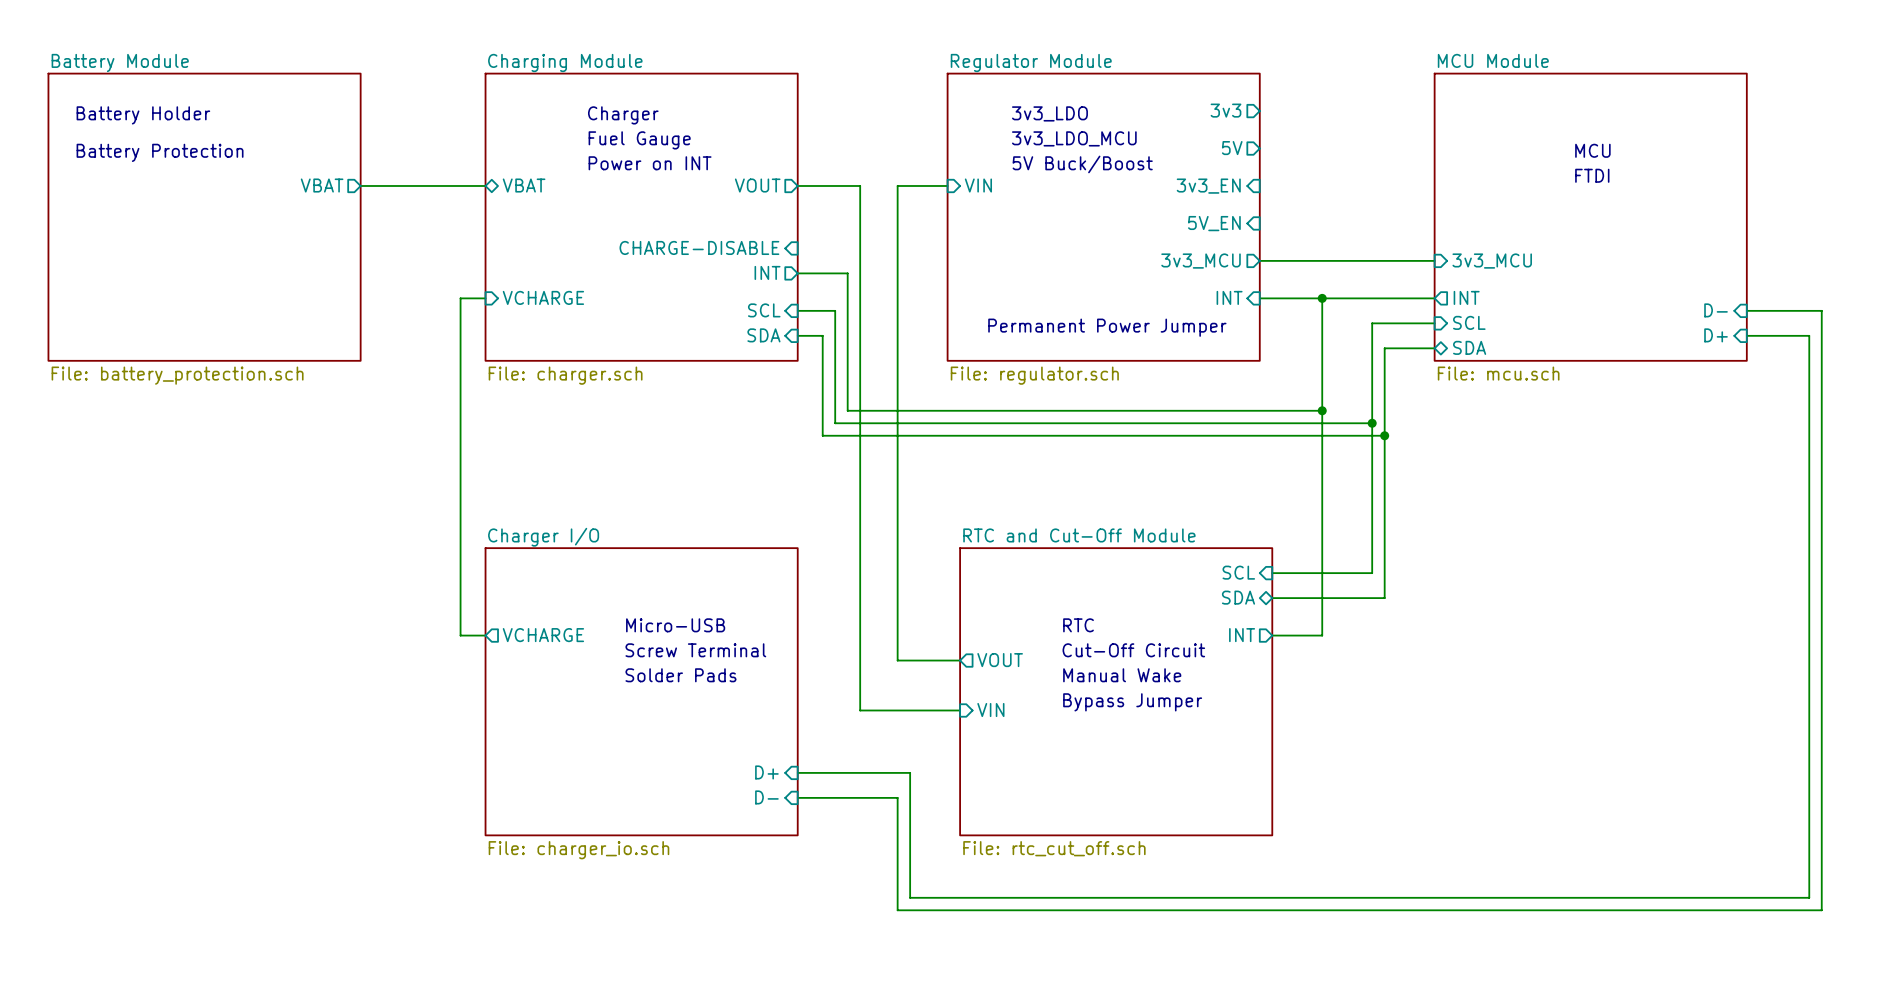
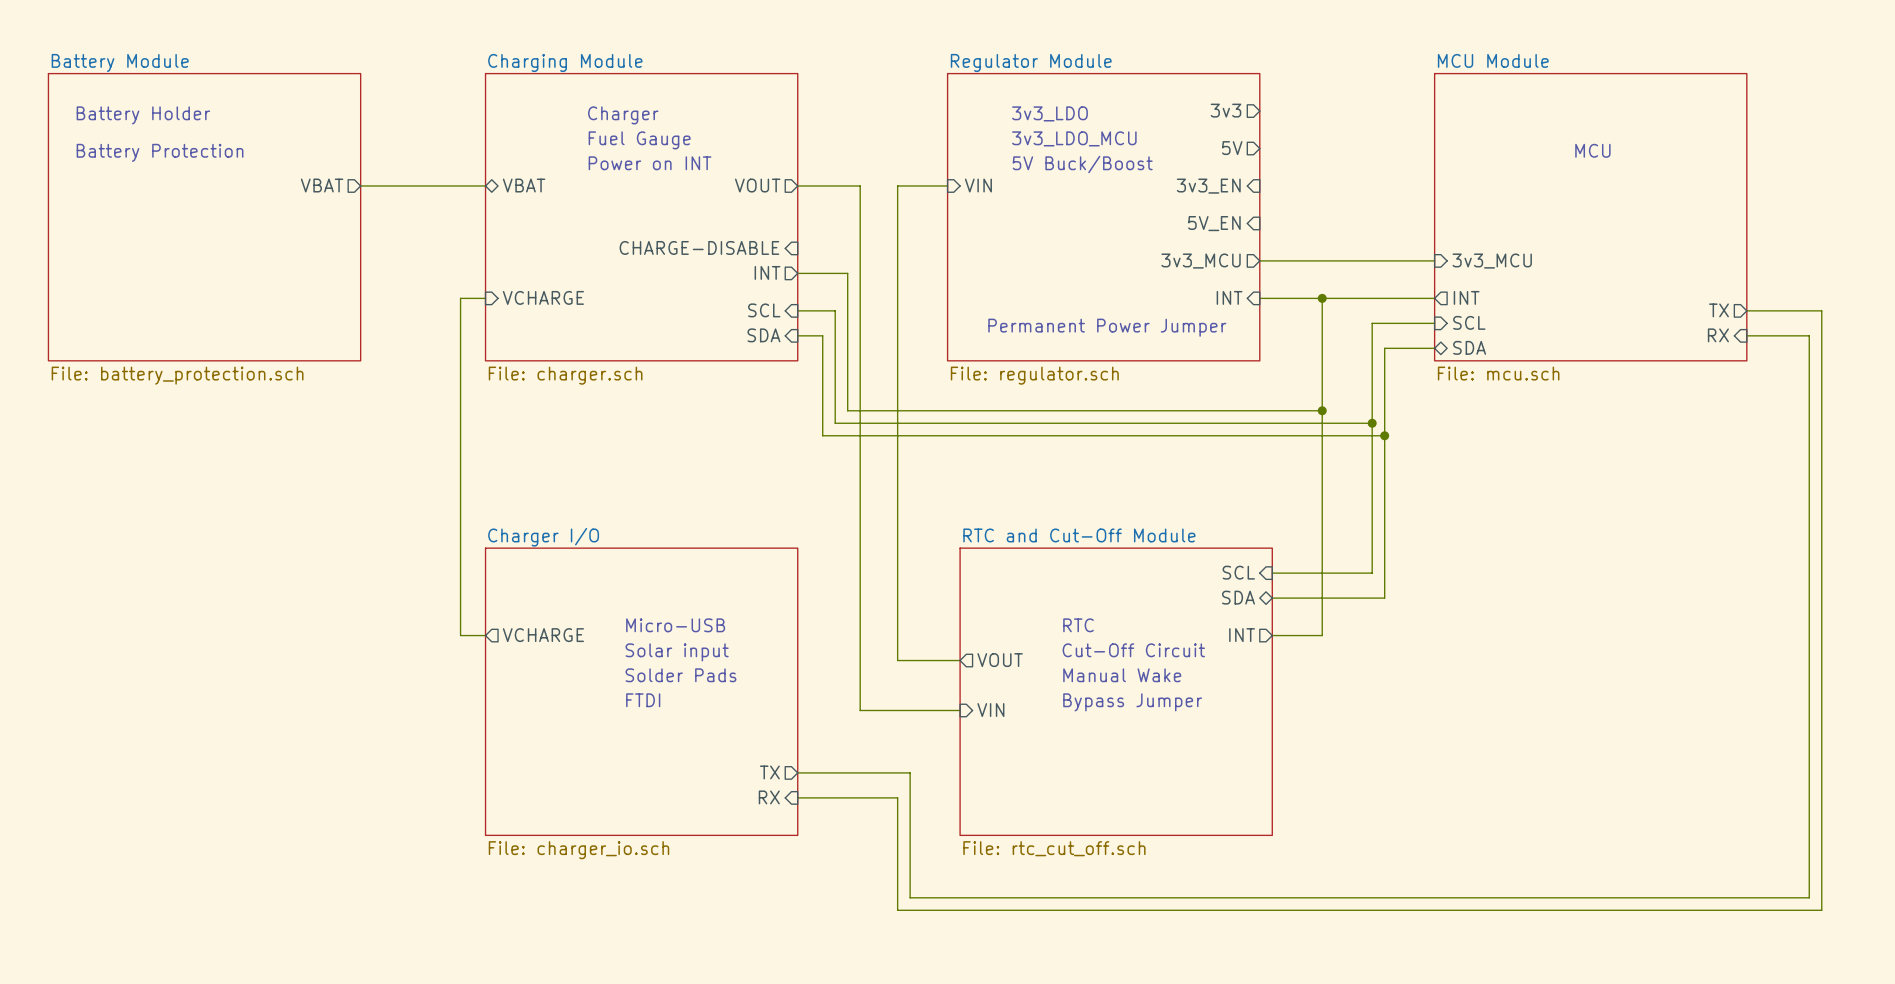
text: FTDI (1592, 175) -> none
sheet pin shape: input (1716, 310) -> output (1718, 310)
sheet pin: D- (1716, 310) -> TX (1718, 310)
sheet pin: D+ (1716, 335) -> RX (1718, 335)
text: Screw Terminal (695, 650) -> Solar input (677, 652)
text: none -> FTDI (643, 700)
sheet pin shape: input (766, 772) -> output (769, 772)
sheet pin: D+ (766, 772) -> TX (769, 772)
sheet pin: D- (766, 797) -> RX (769, 797)

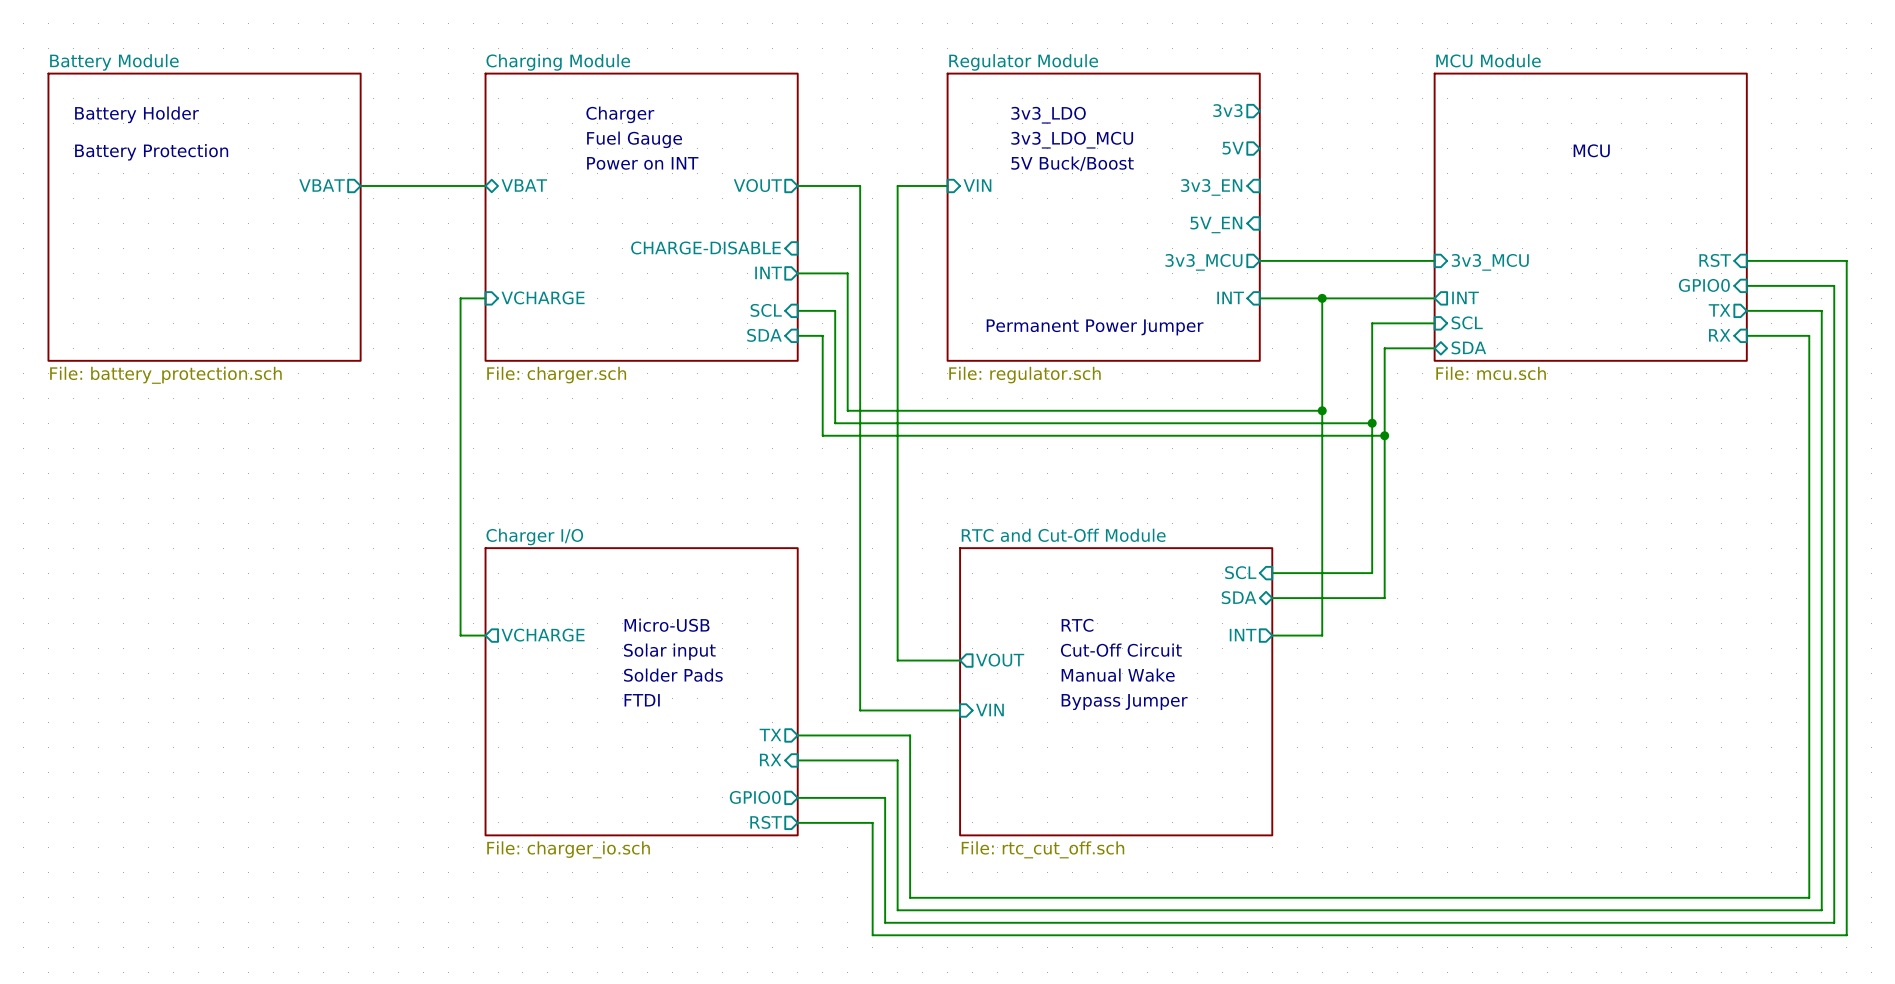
sheet pin: none -> RST (1715, 260)
wire: none -> (1746, 260) (1846, 260) (1846, 935) (872, 935) (872, 822) (797, 822)
sheet pin: none -> GPIO0 (1704, 285)
wire: none -> (1746, 285) (1834, 285) (1834, 922) (885, 922) (885, 797)
sheet pin: none -> RX (770, 759)
sheet pin position: TX (769, 772) -> TX (770, 735)
wire: (797, 772) (910, 772) -> (797, 735) (910, 735) (910, 772)
sheet pin shape: input (769, 797) -> output (755, 797)
sheet pin: RX (769, 797) -> GPIO0 (755, 797)
wire: (885, 797) (897, 797) -> (797, 760) (897, 760) (897, 797)
sheet pin: none -> RST (766, 822)

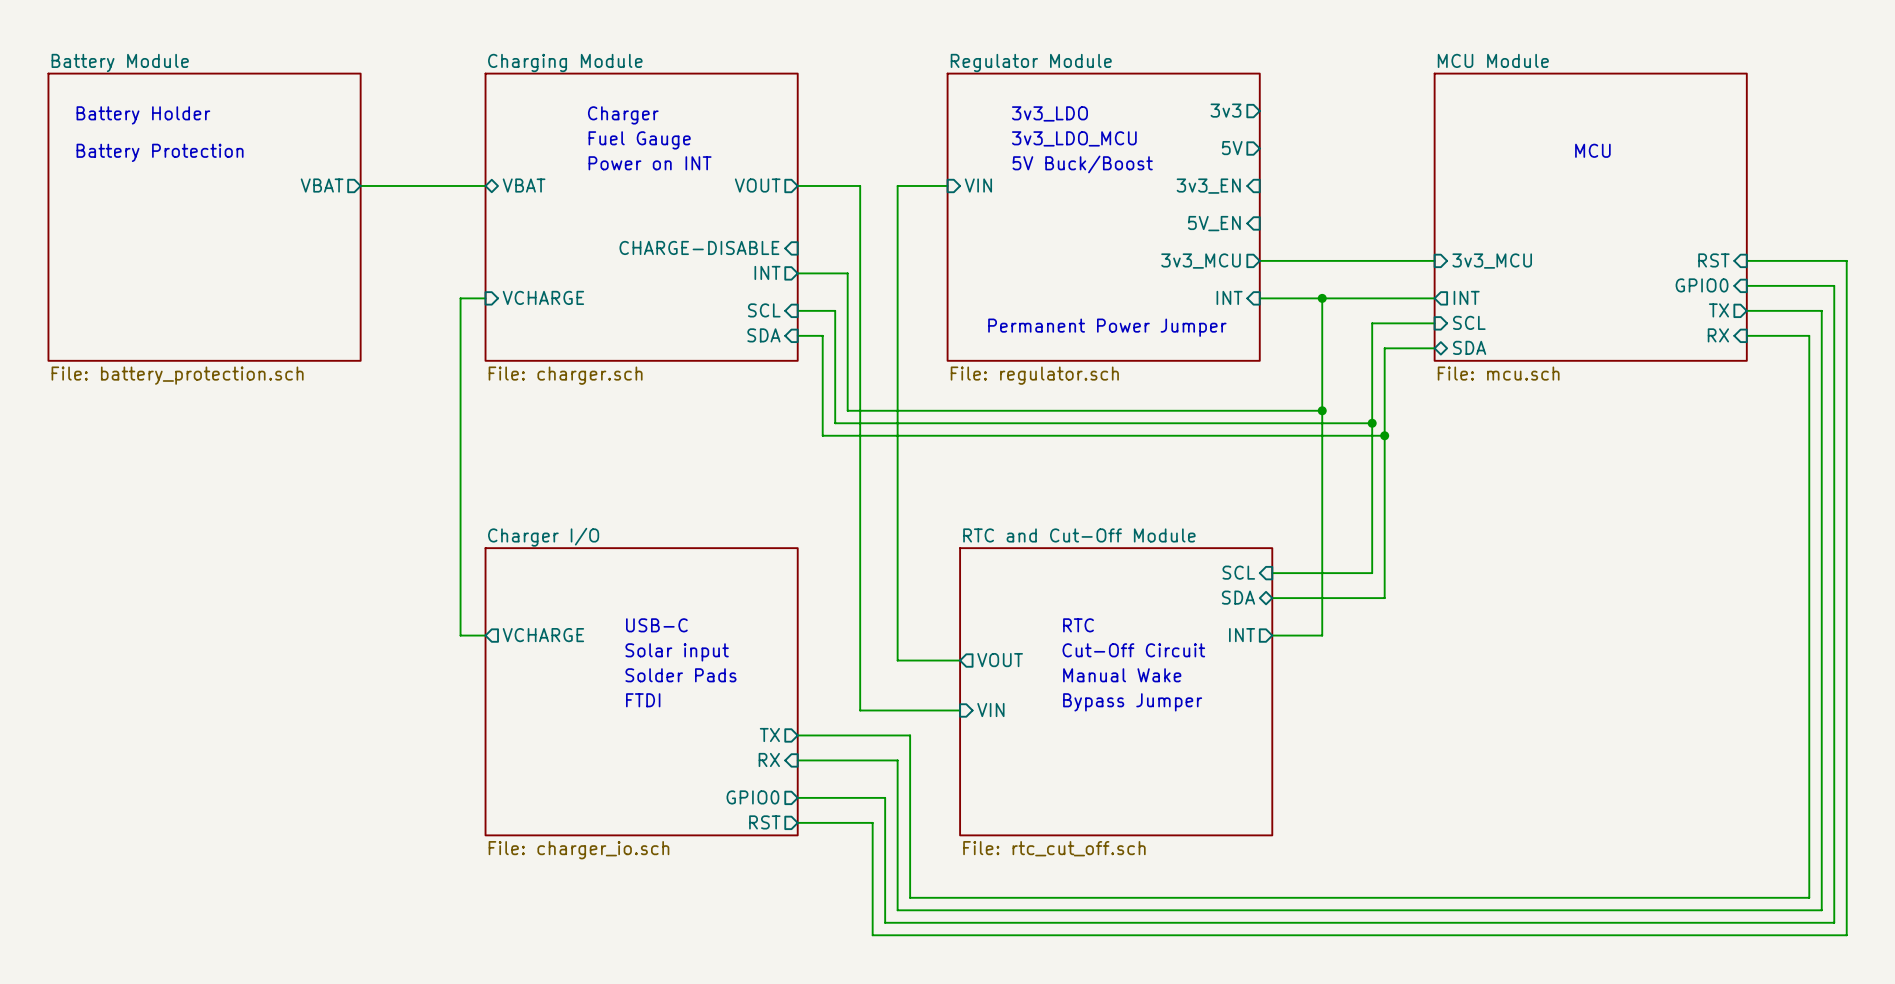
text: Micro-USB (667, 625) -> USB-C (656, 625)

